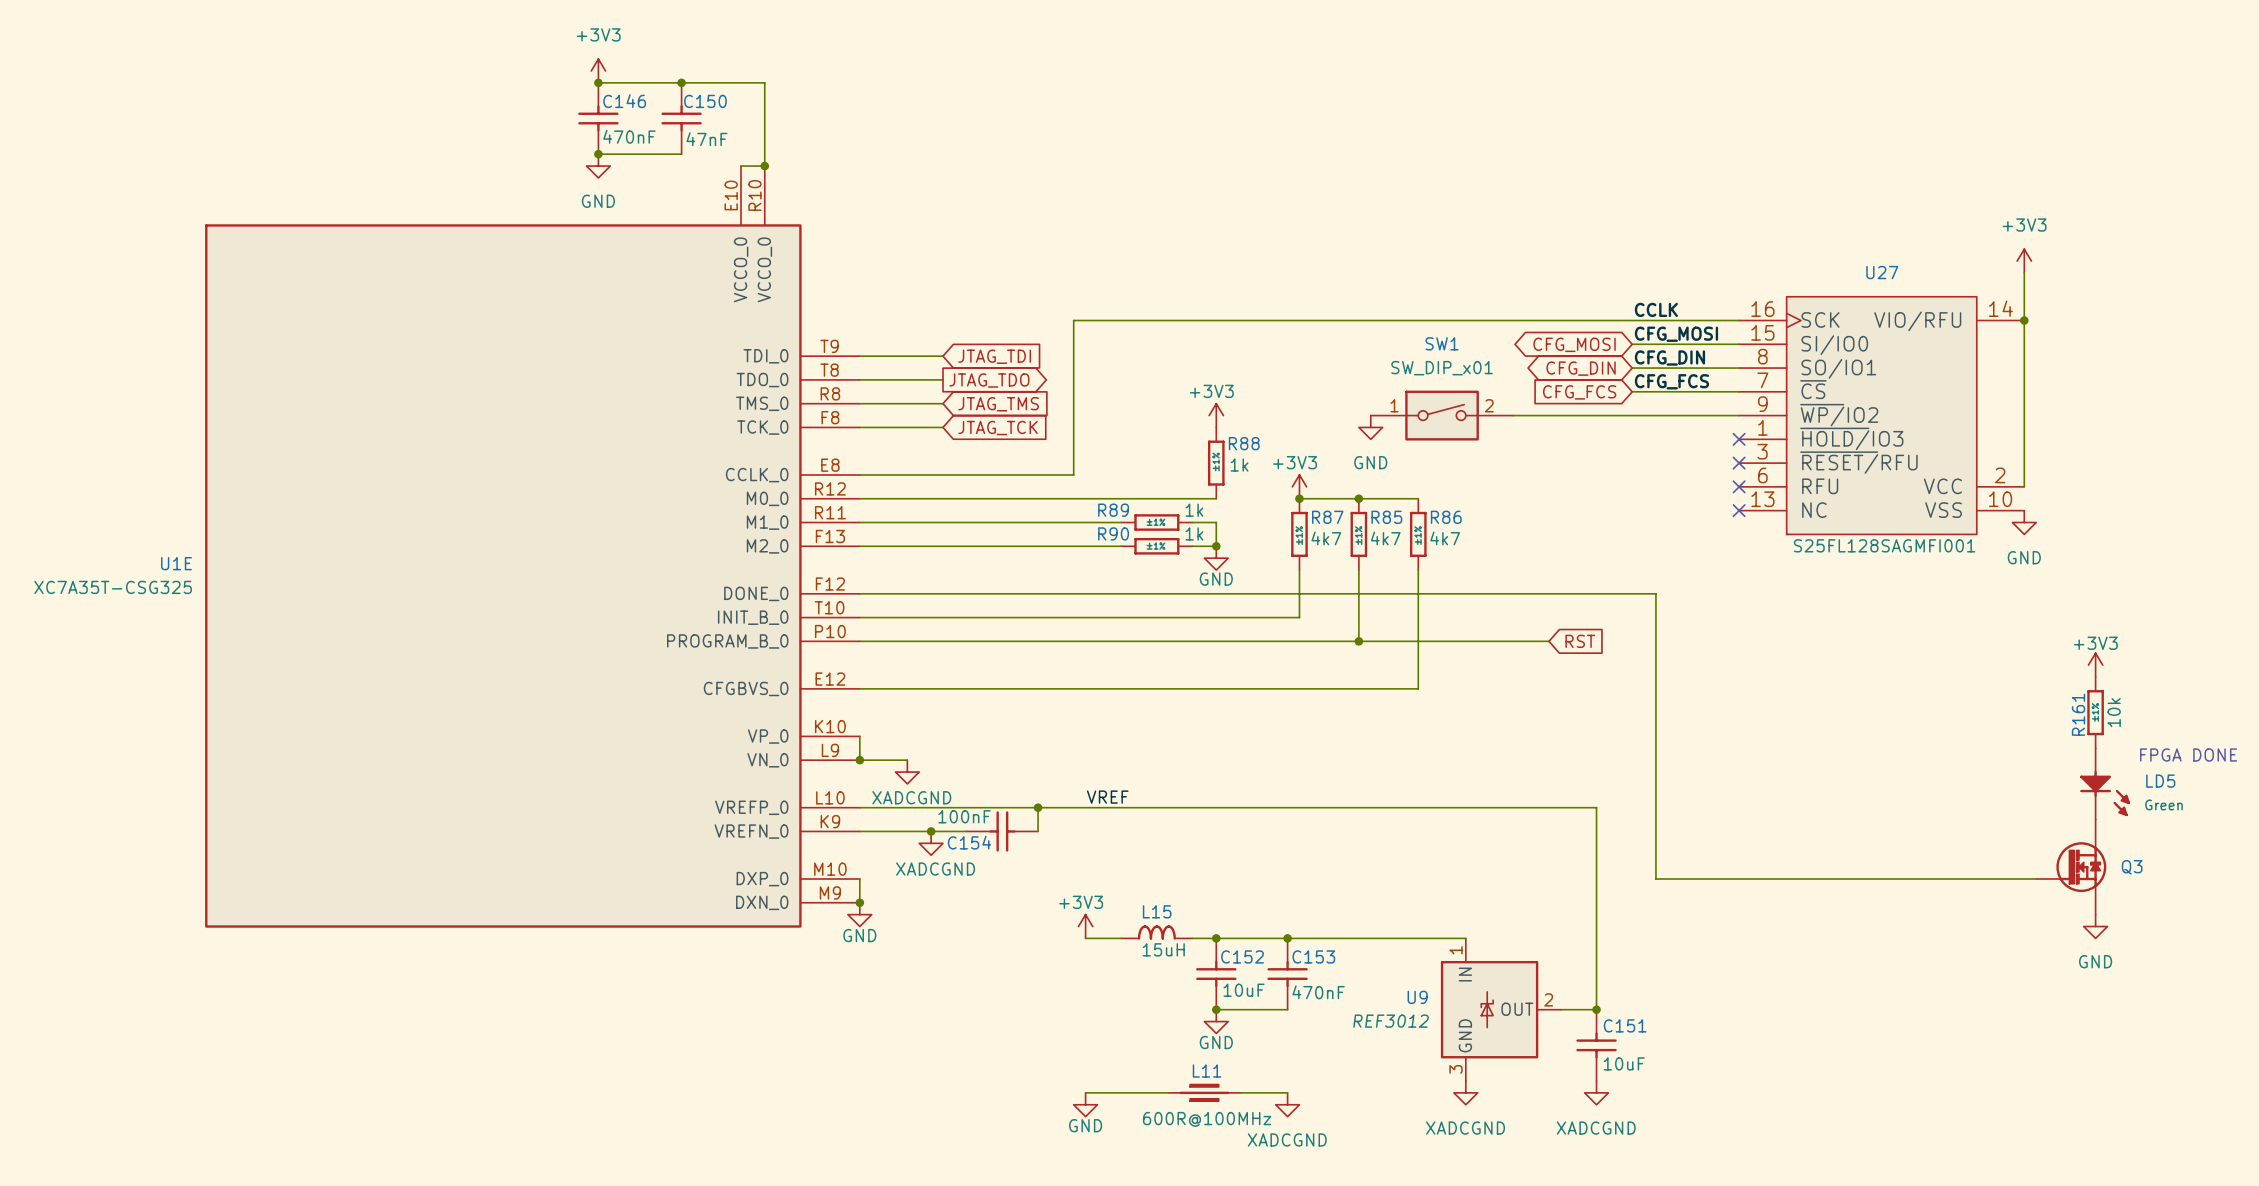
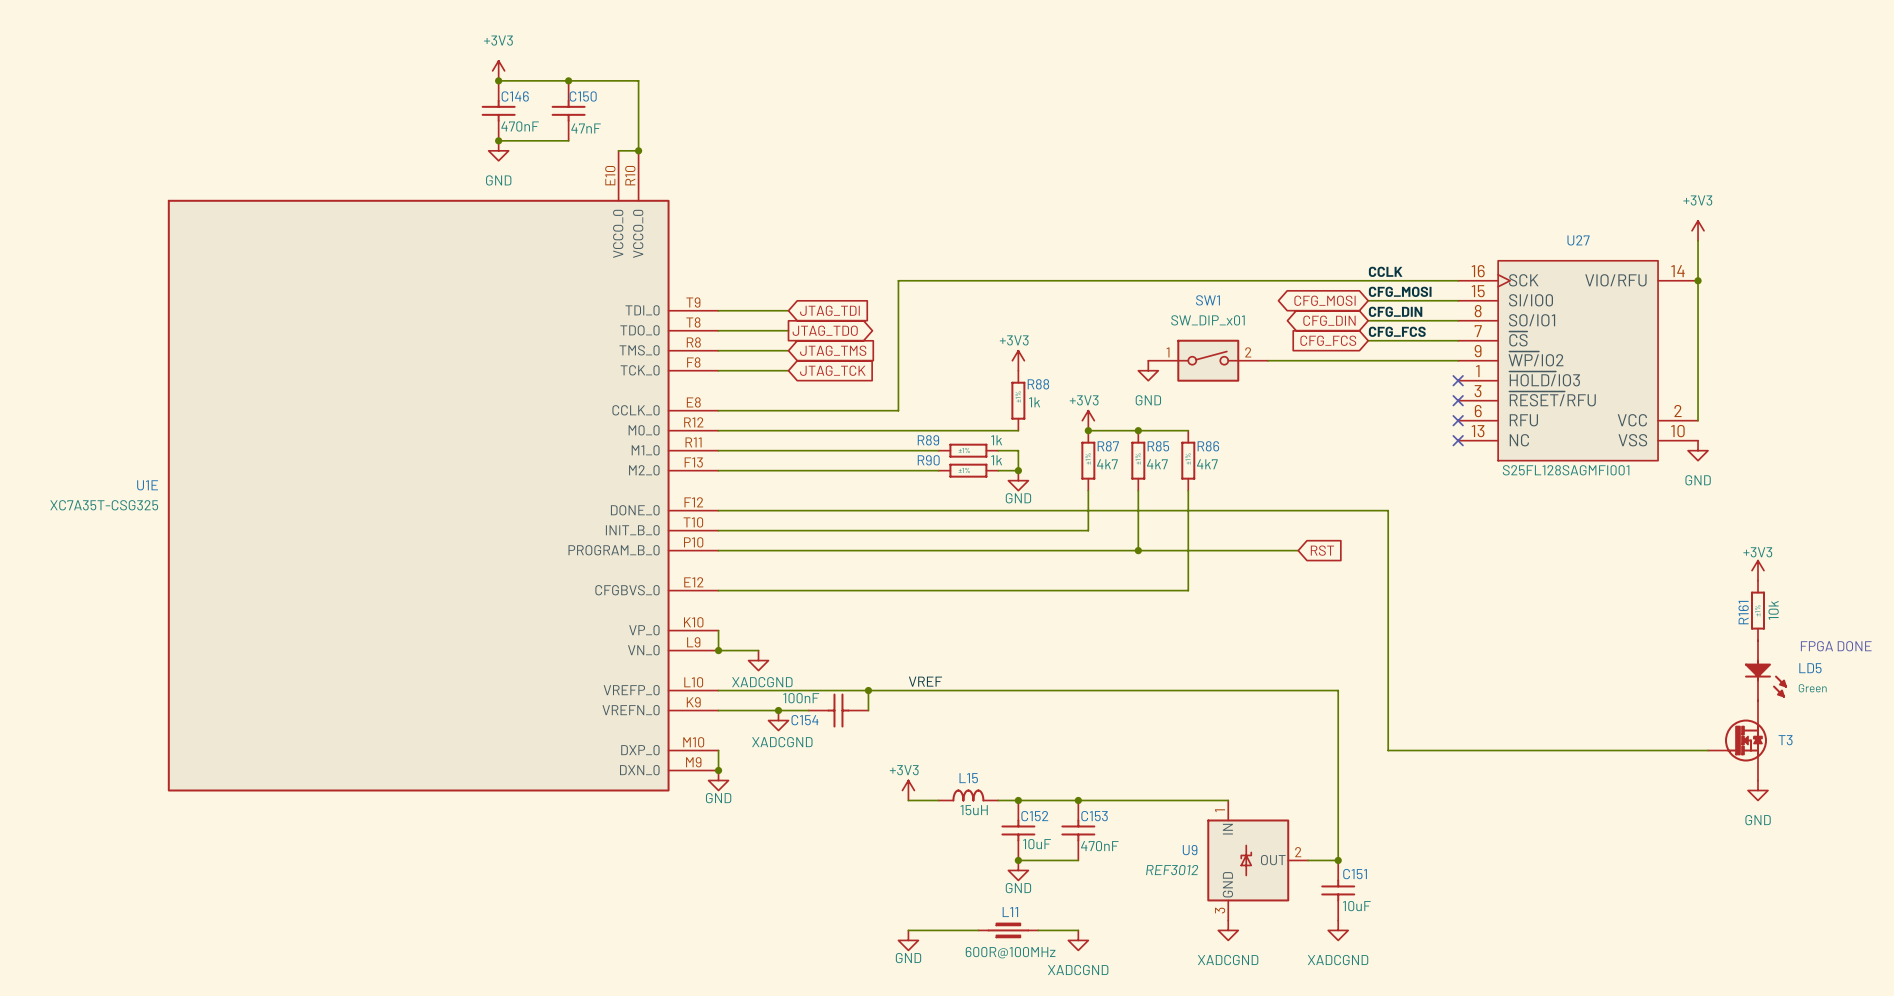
Q3 name: Q3 (2132, 867) -> T3 (1785, 740)

